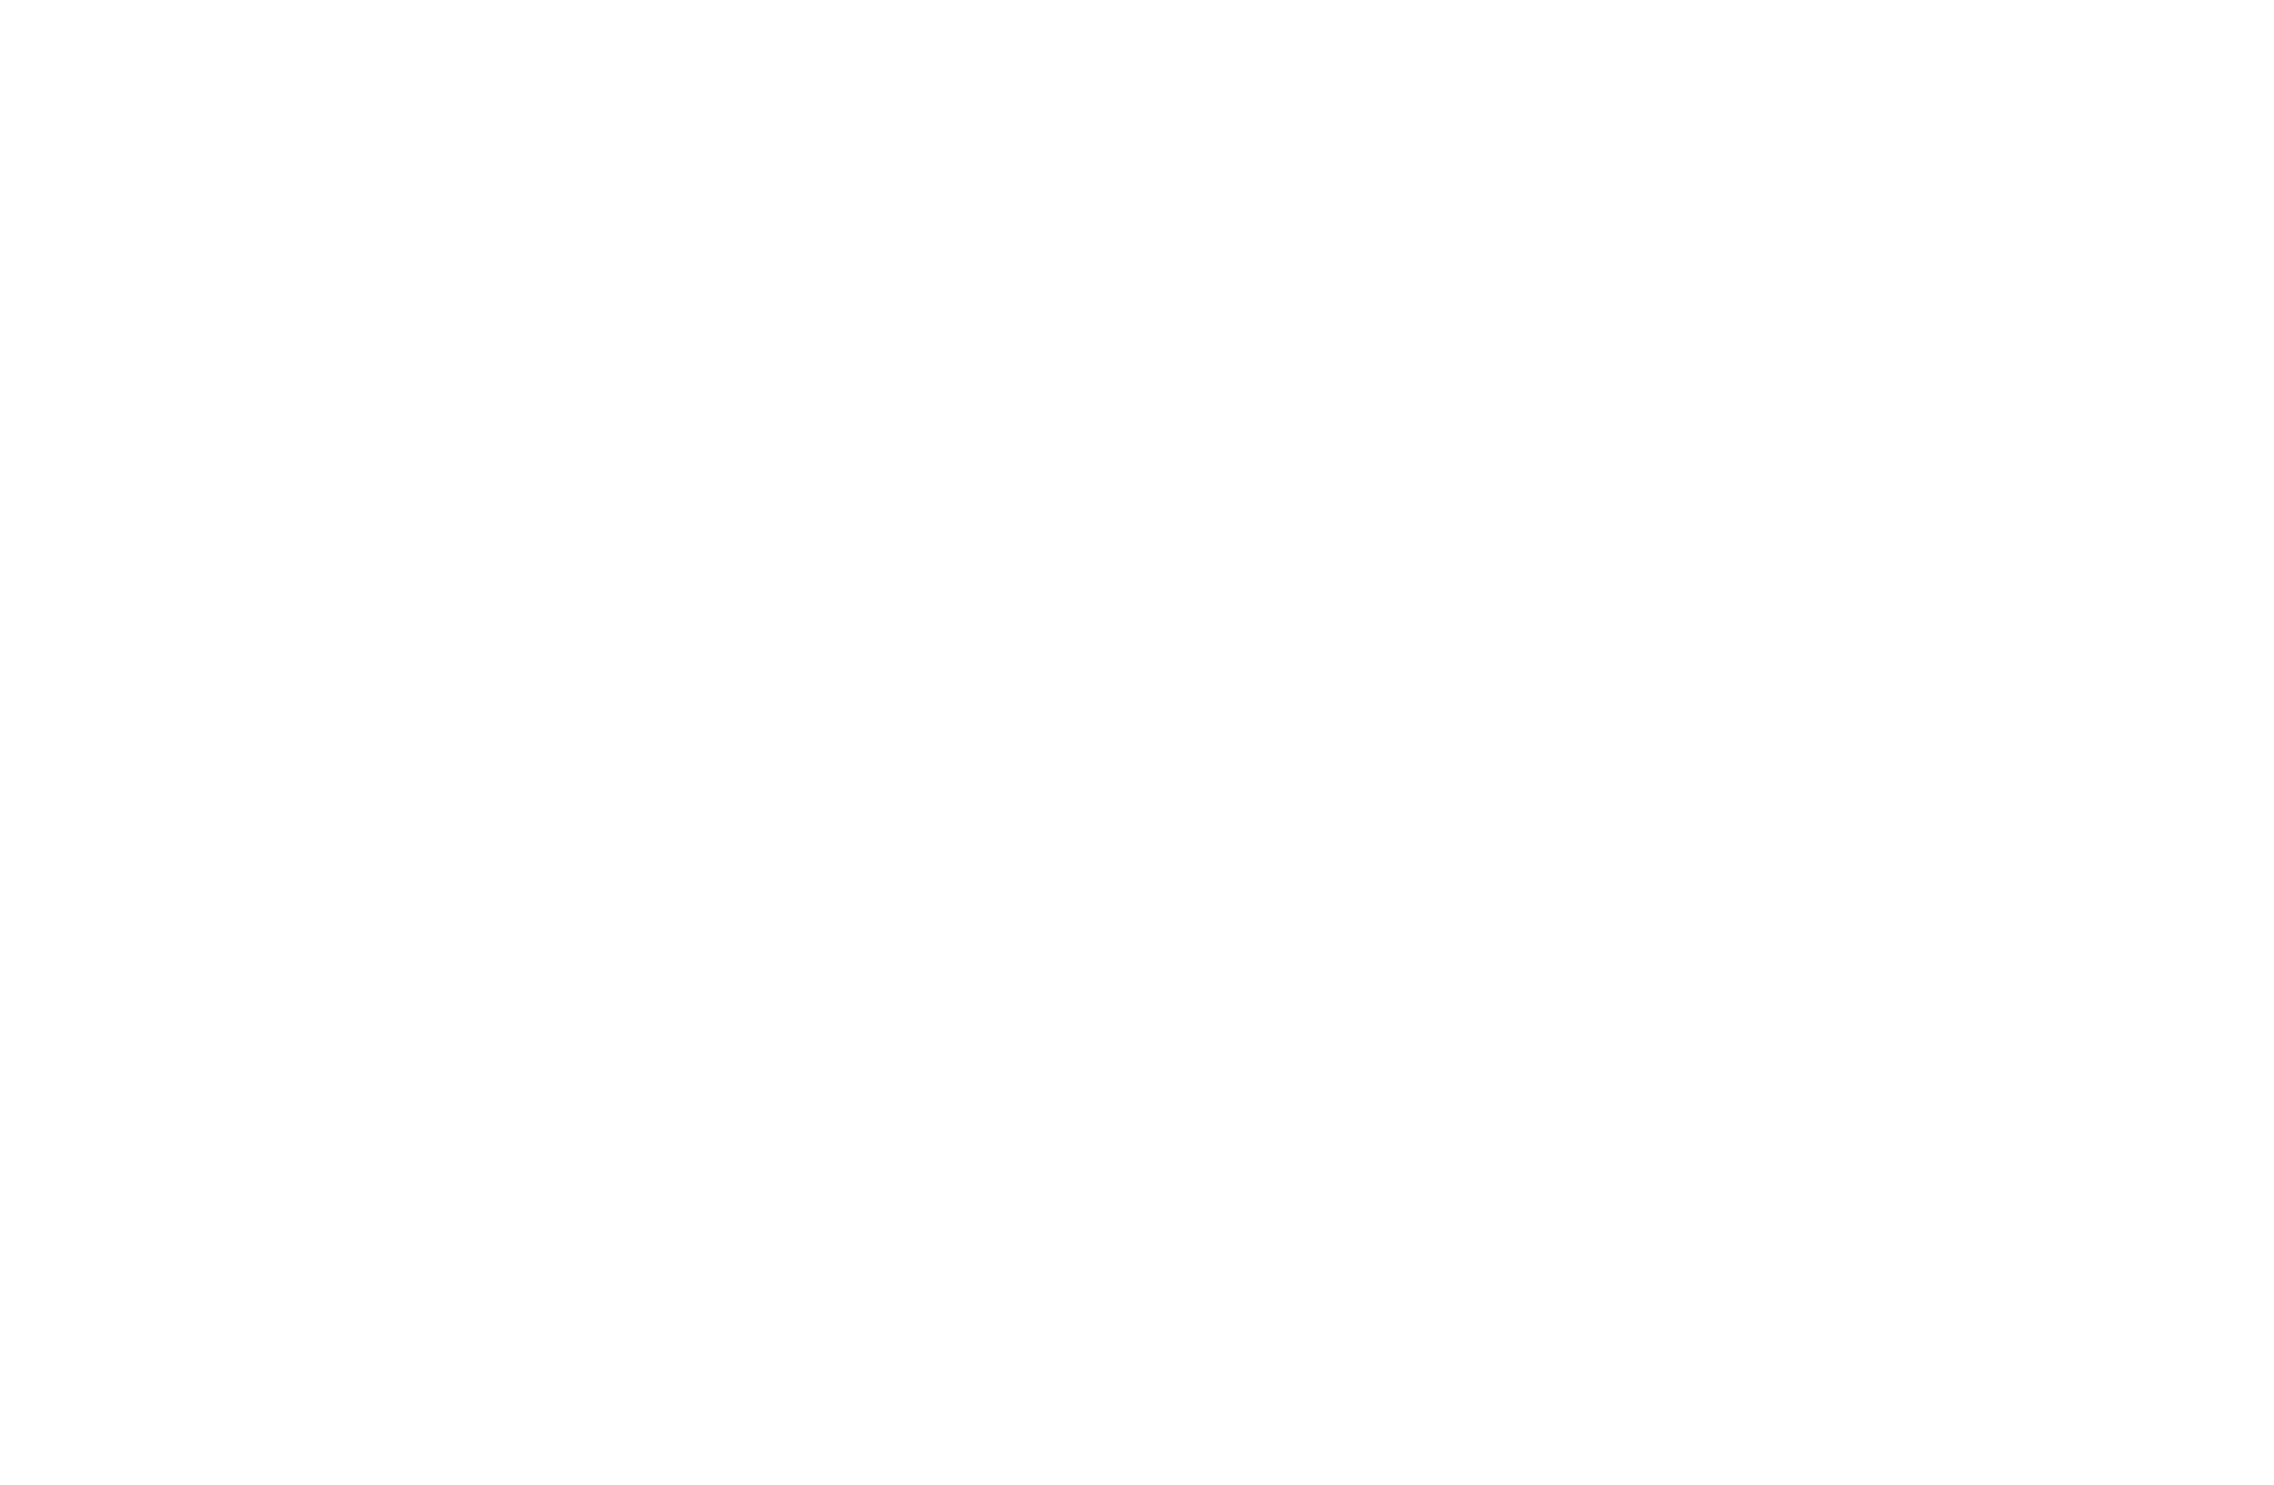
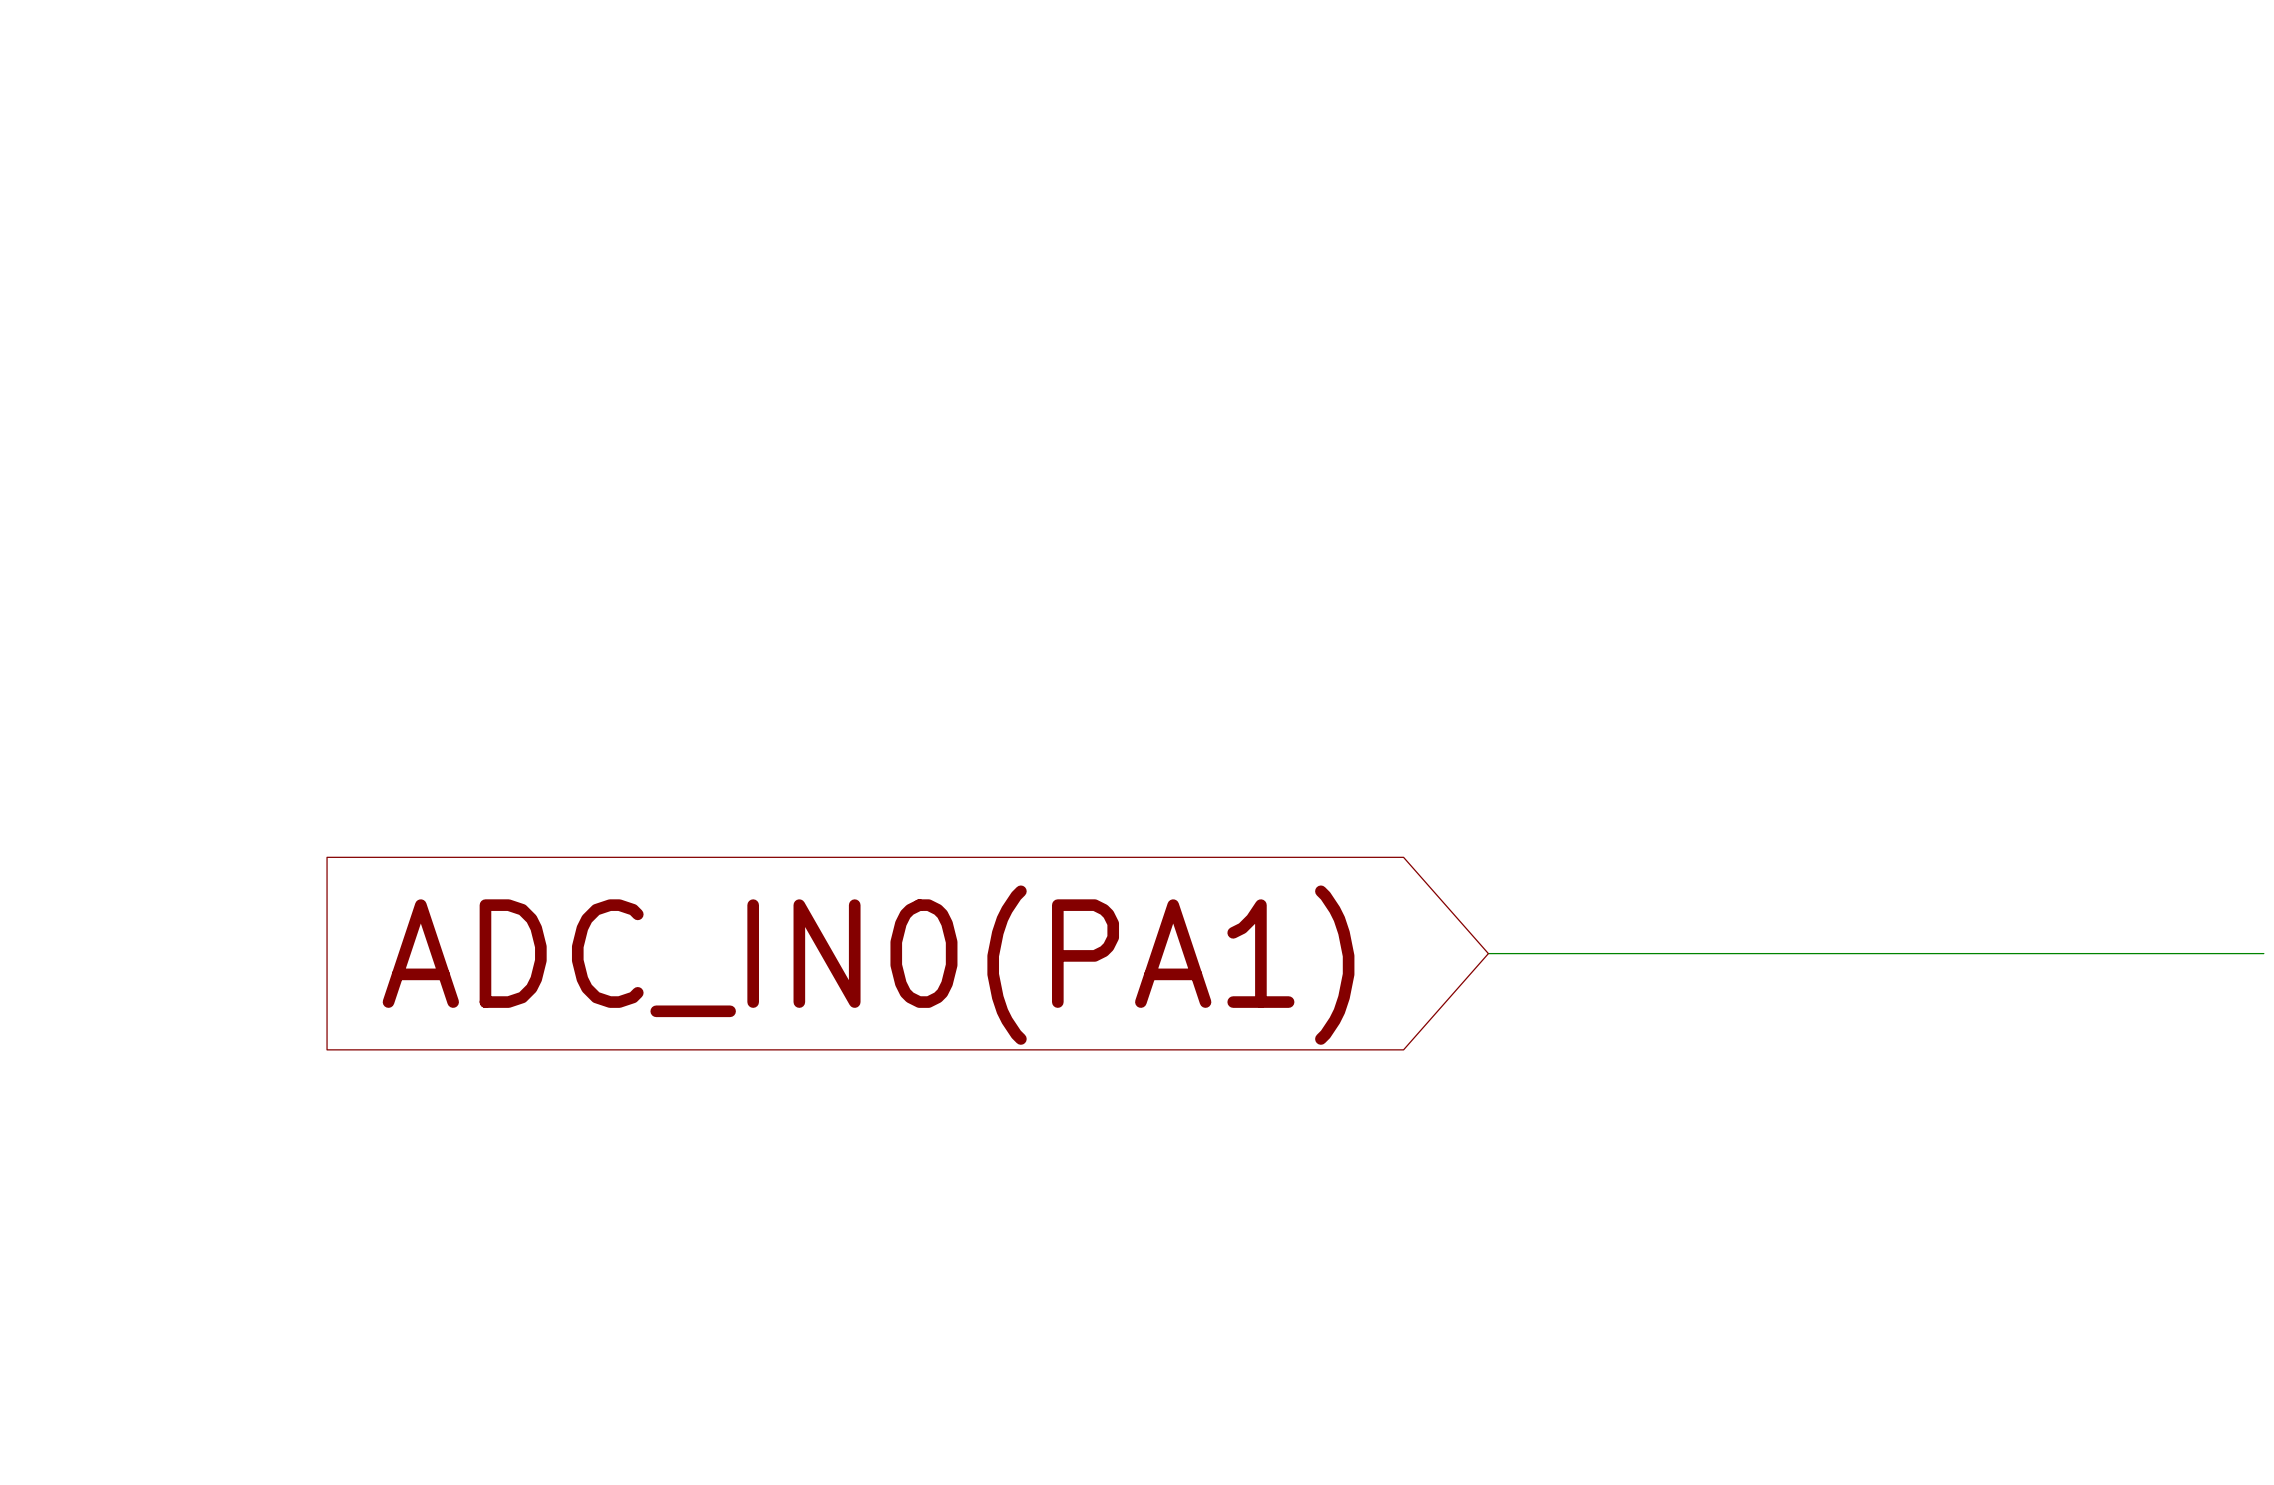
wire: none -> (1488, 953) (2263, 953)
global label: none -> ADC_IN0(PA1) (868, 965)

